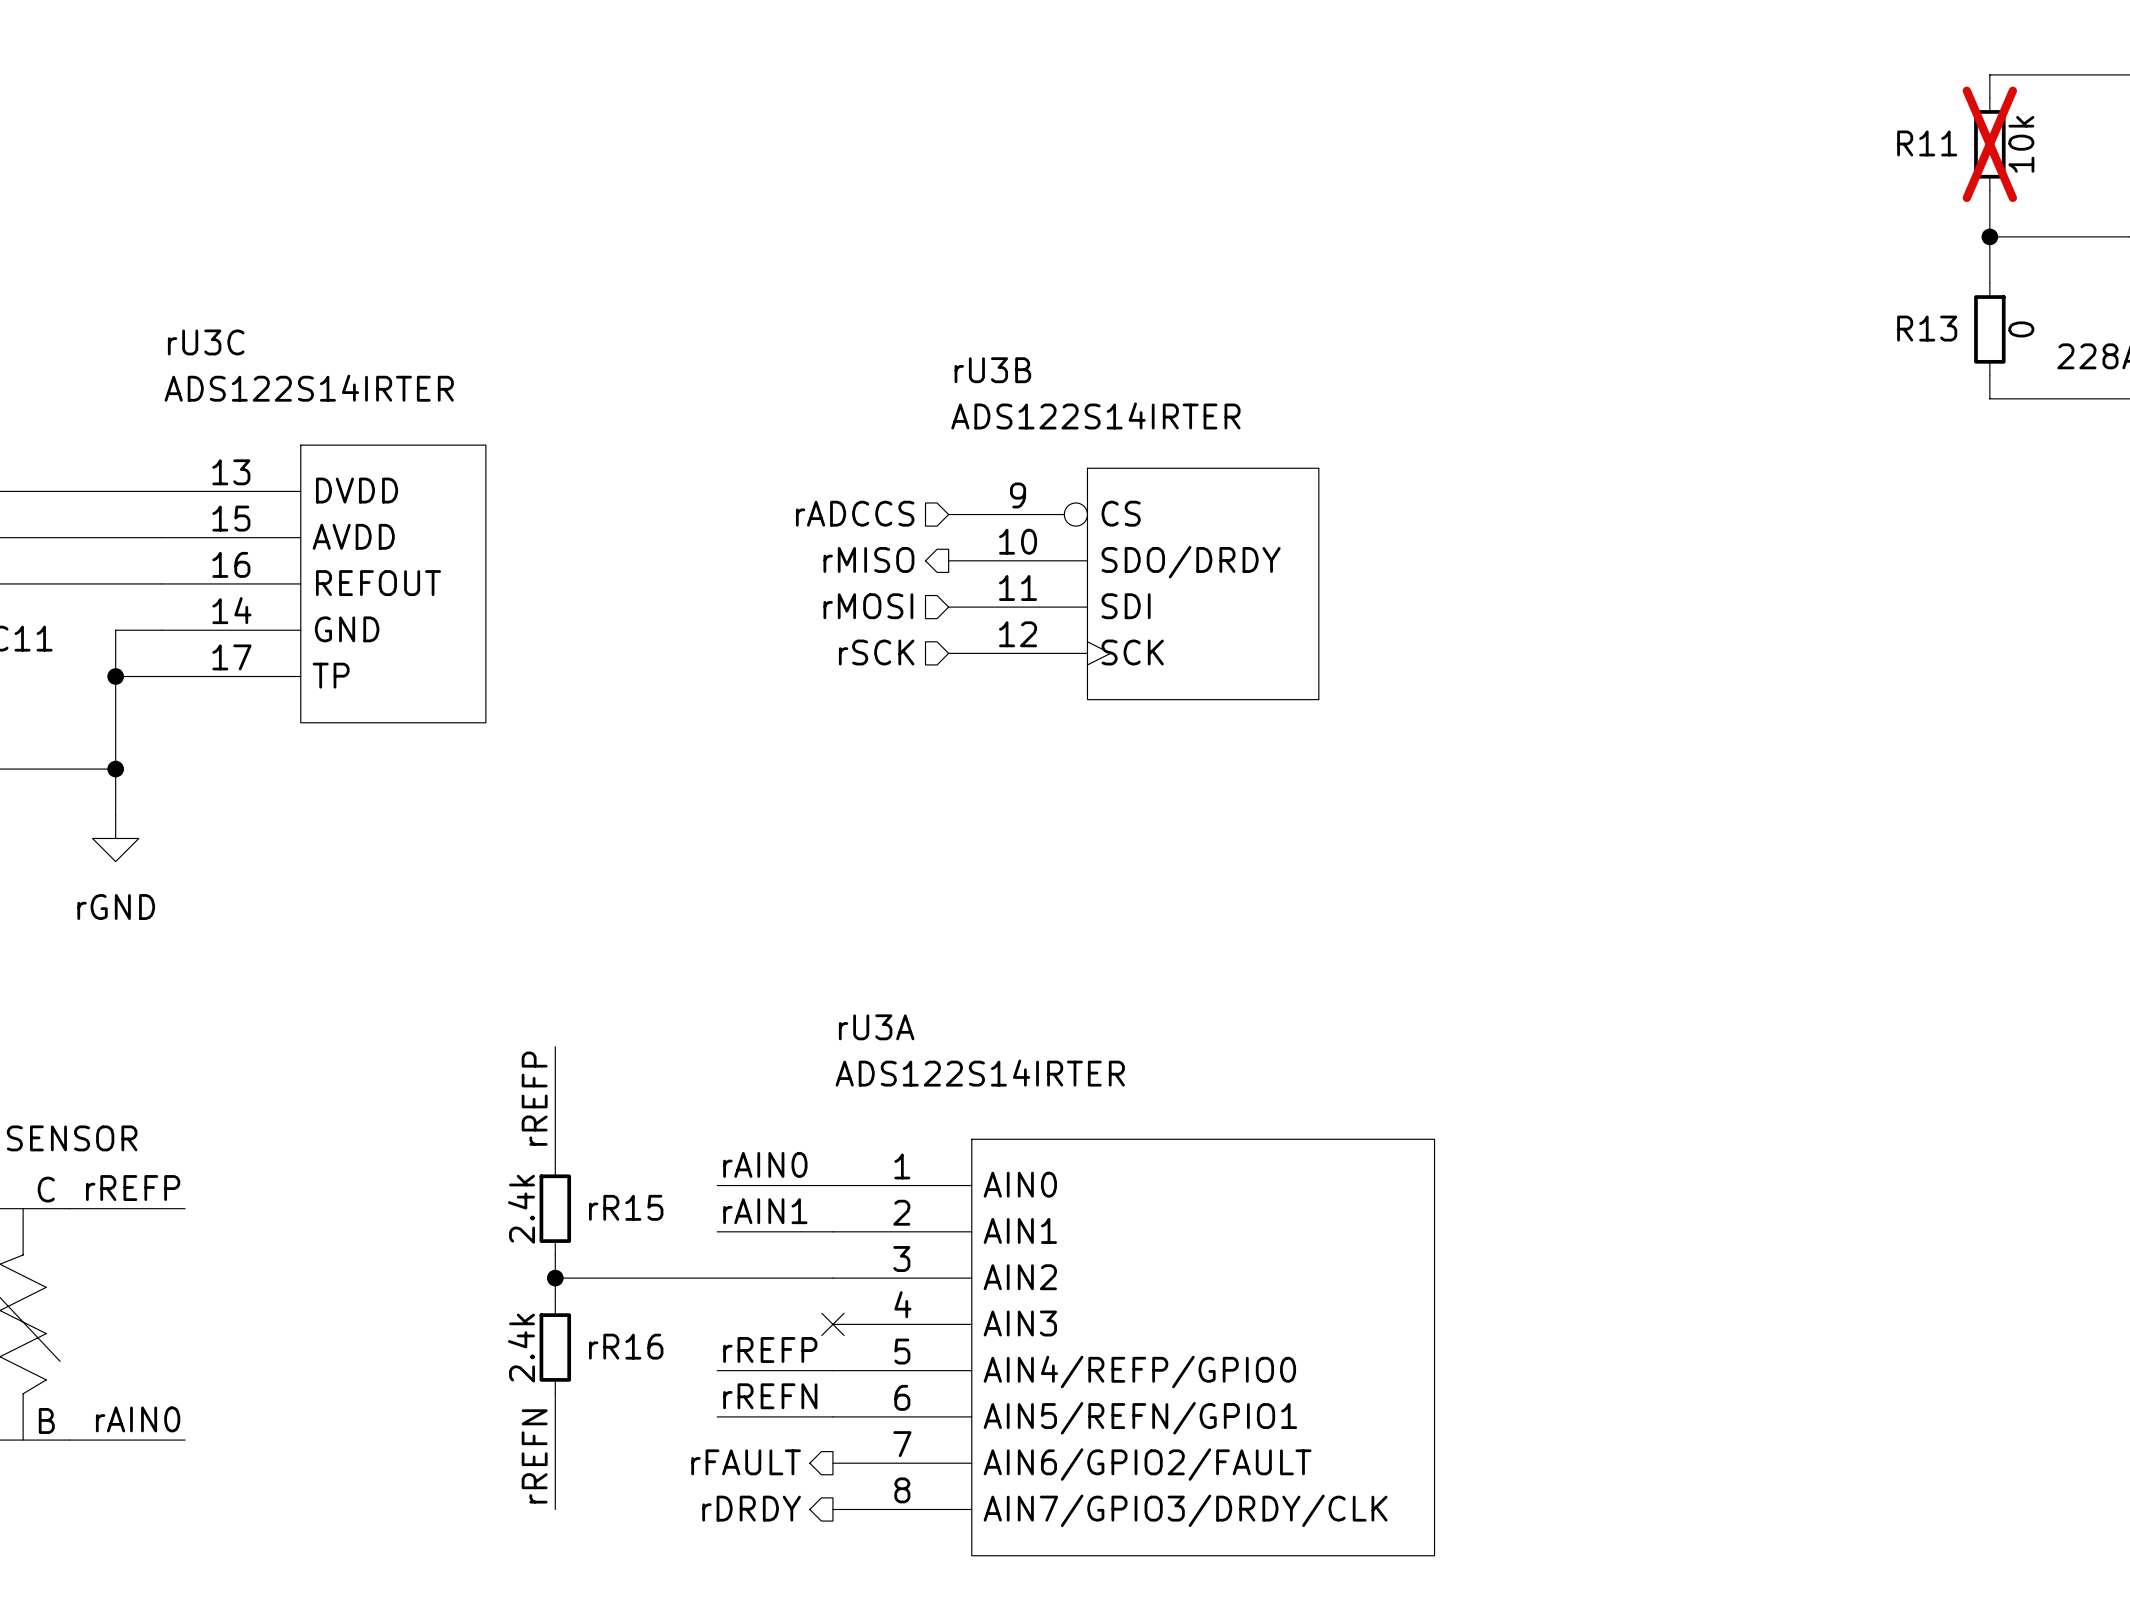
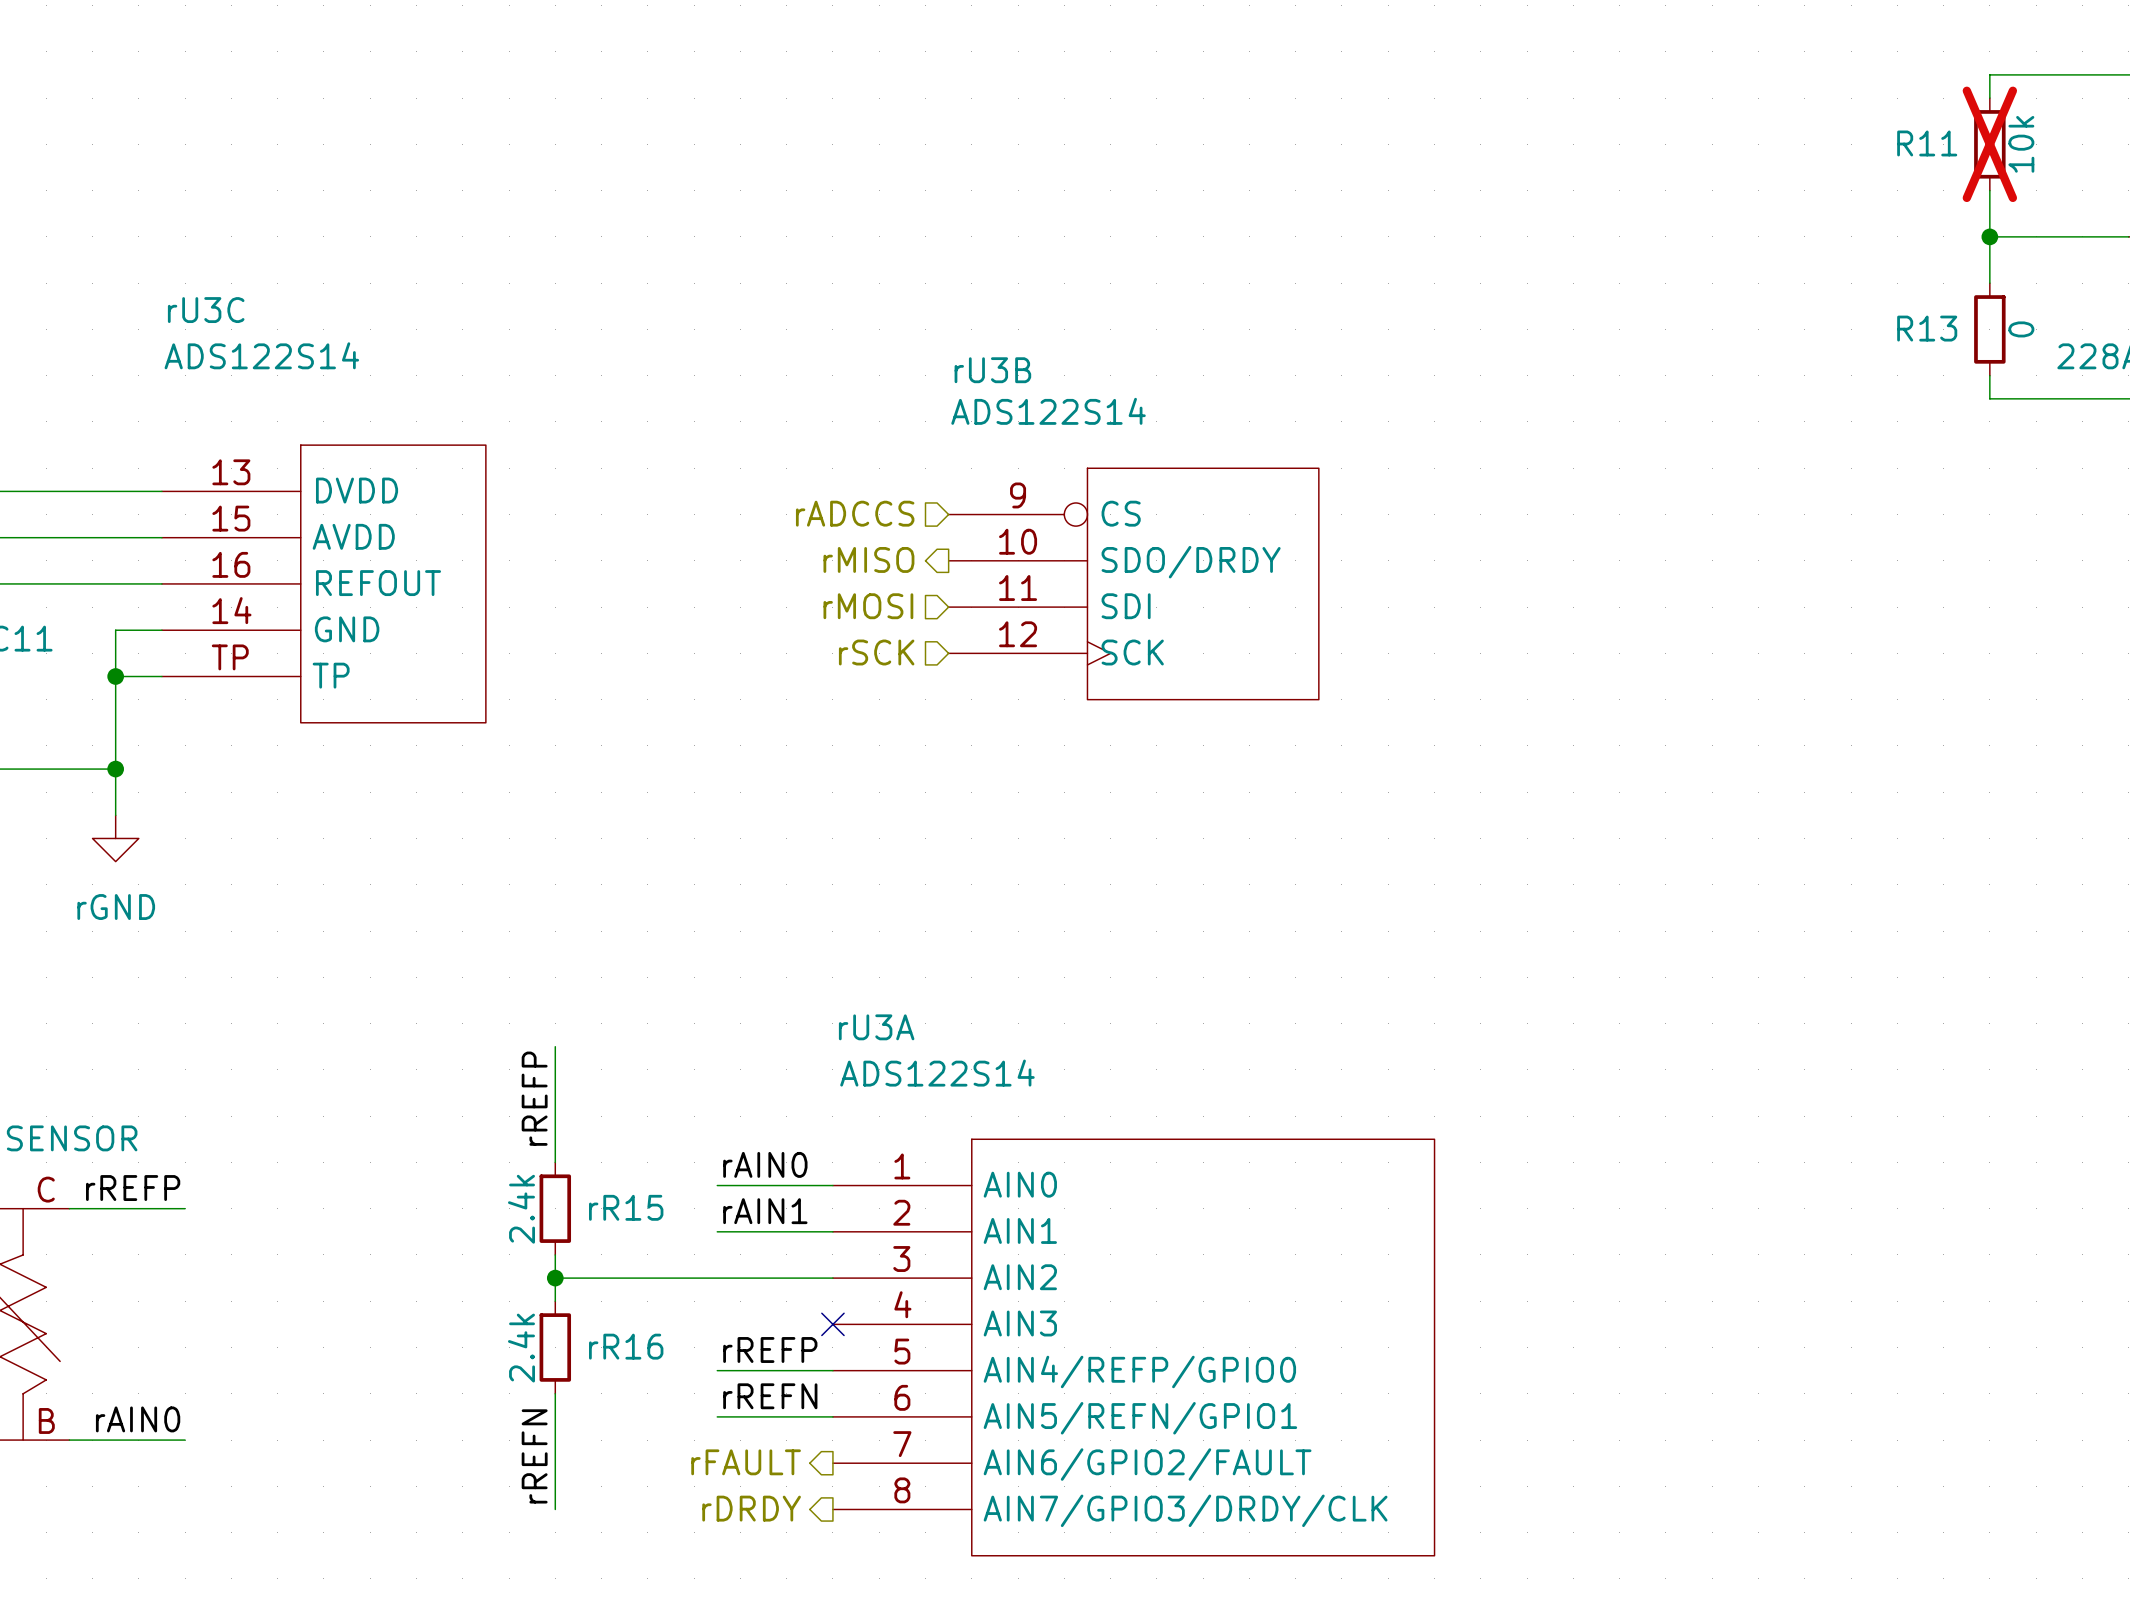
rU3C name position: rU3C (206, 342) -> rU3C (206, 310)
rU3C value: ADS122S14IRTER (309, 388) -> ADS122S14 (261, 355)
rU3B value: ADS122S14IRTER (1095, 415) -> ADS122S14 (1048, 411)
rU3C pin number: 17 (231, 657) -> TP (230, 657)
rU3A value: ADS122S14IRTER (980, 1073) -> ADS122S14 (937, 1073)

